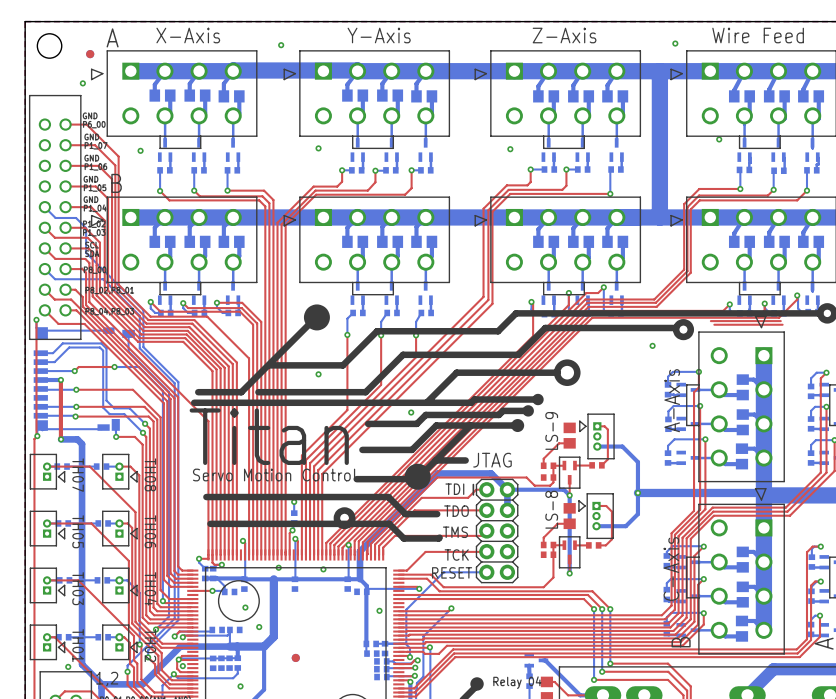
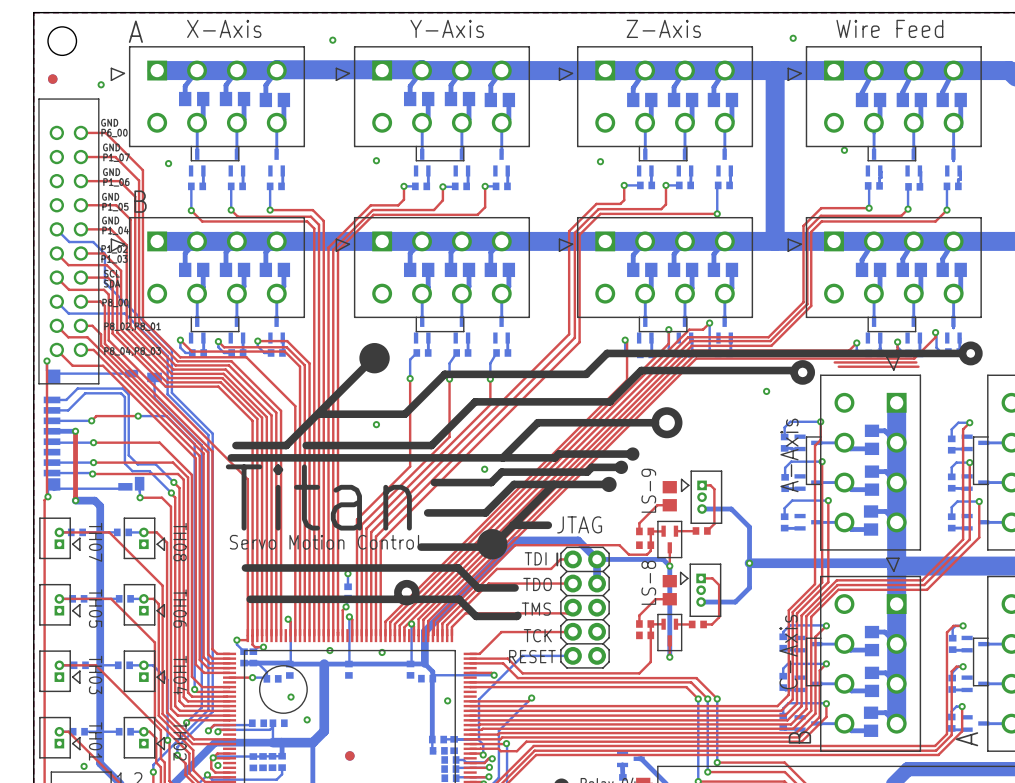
part position: (90, 54) -> (52, 79)

